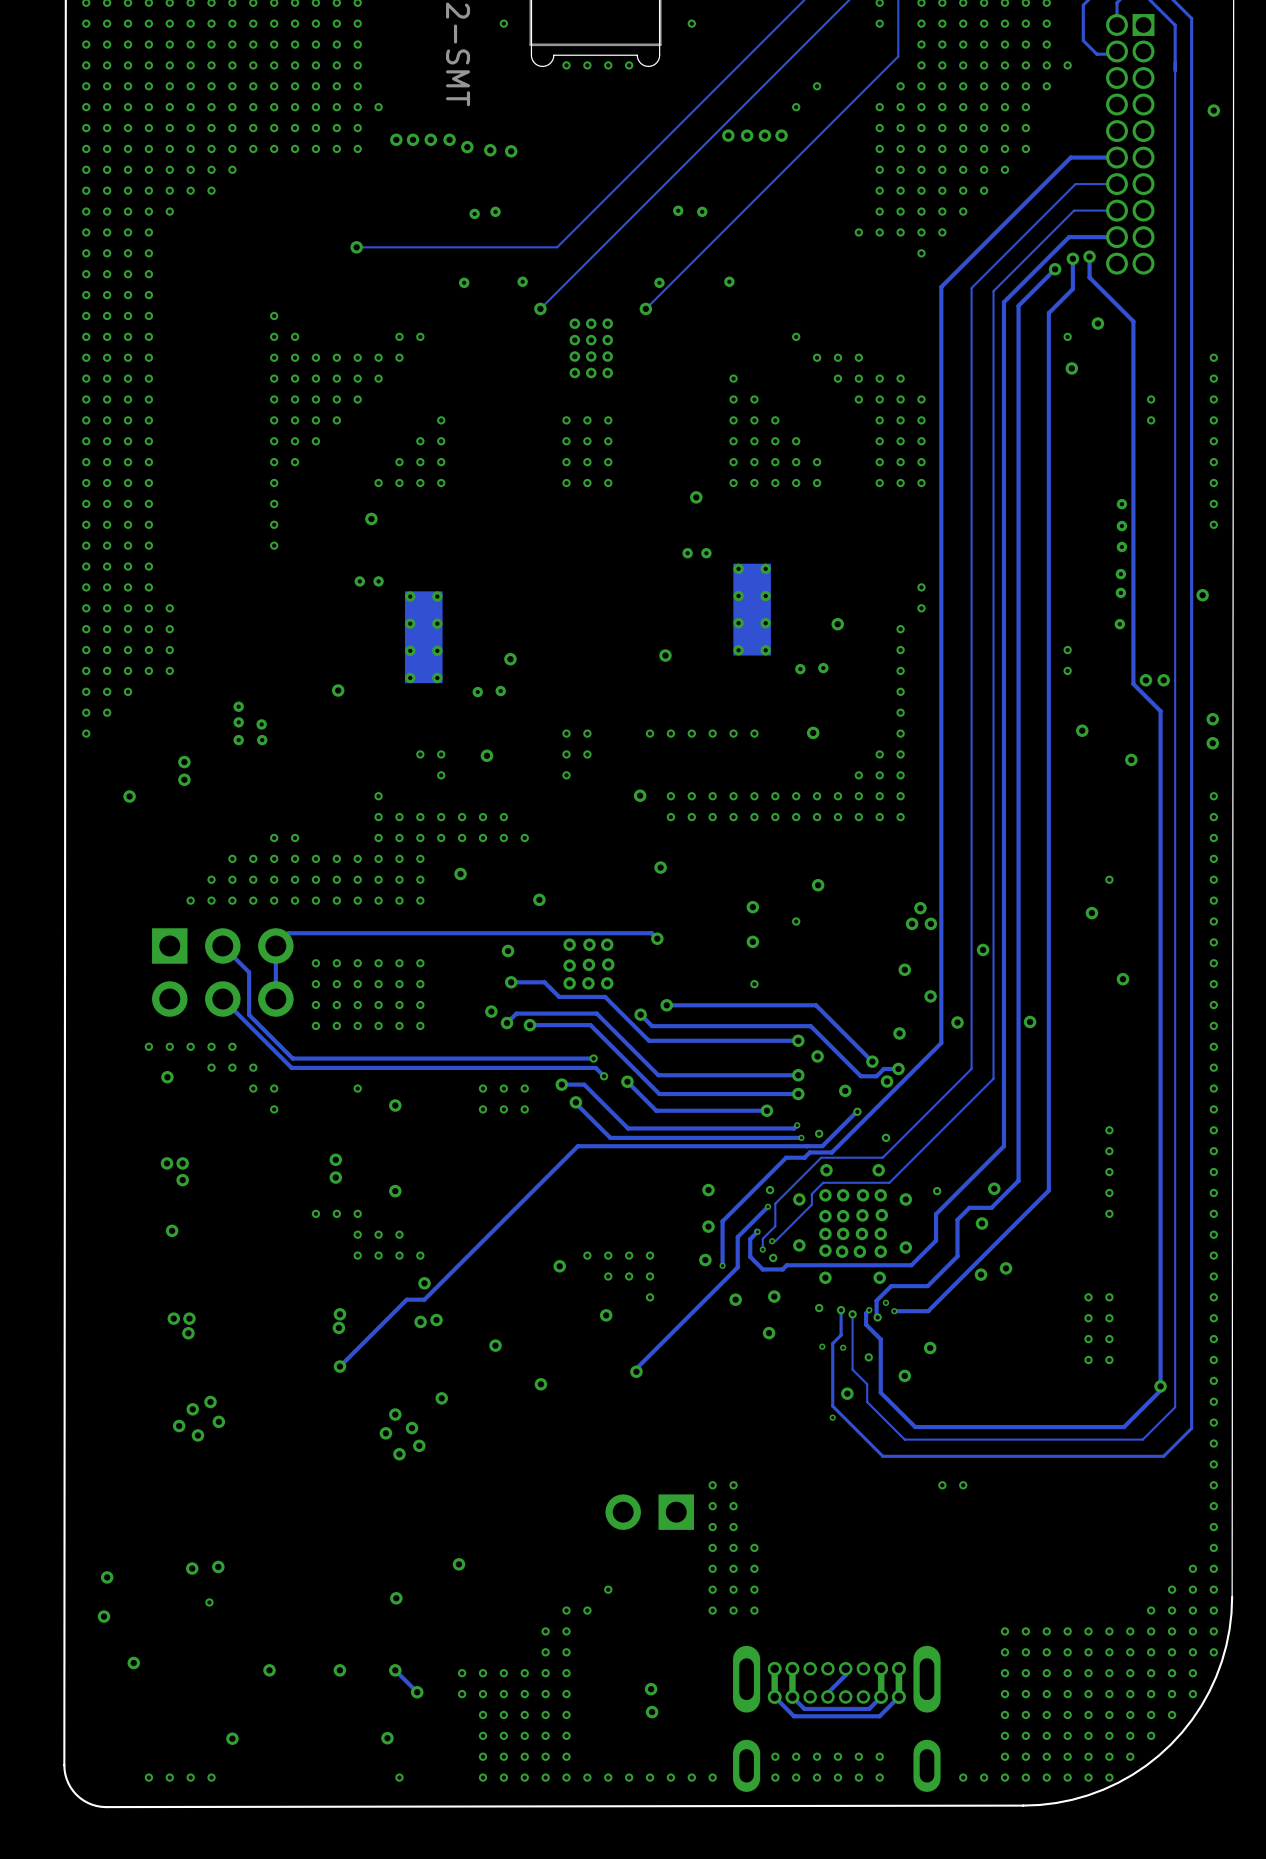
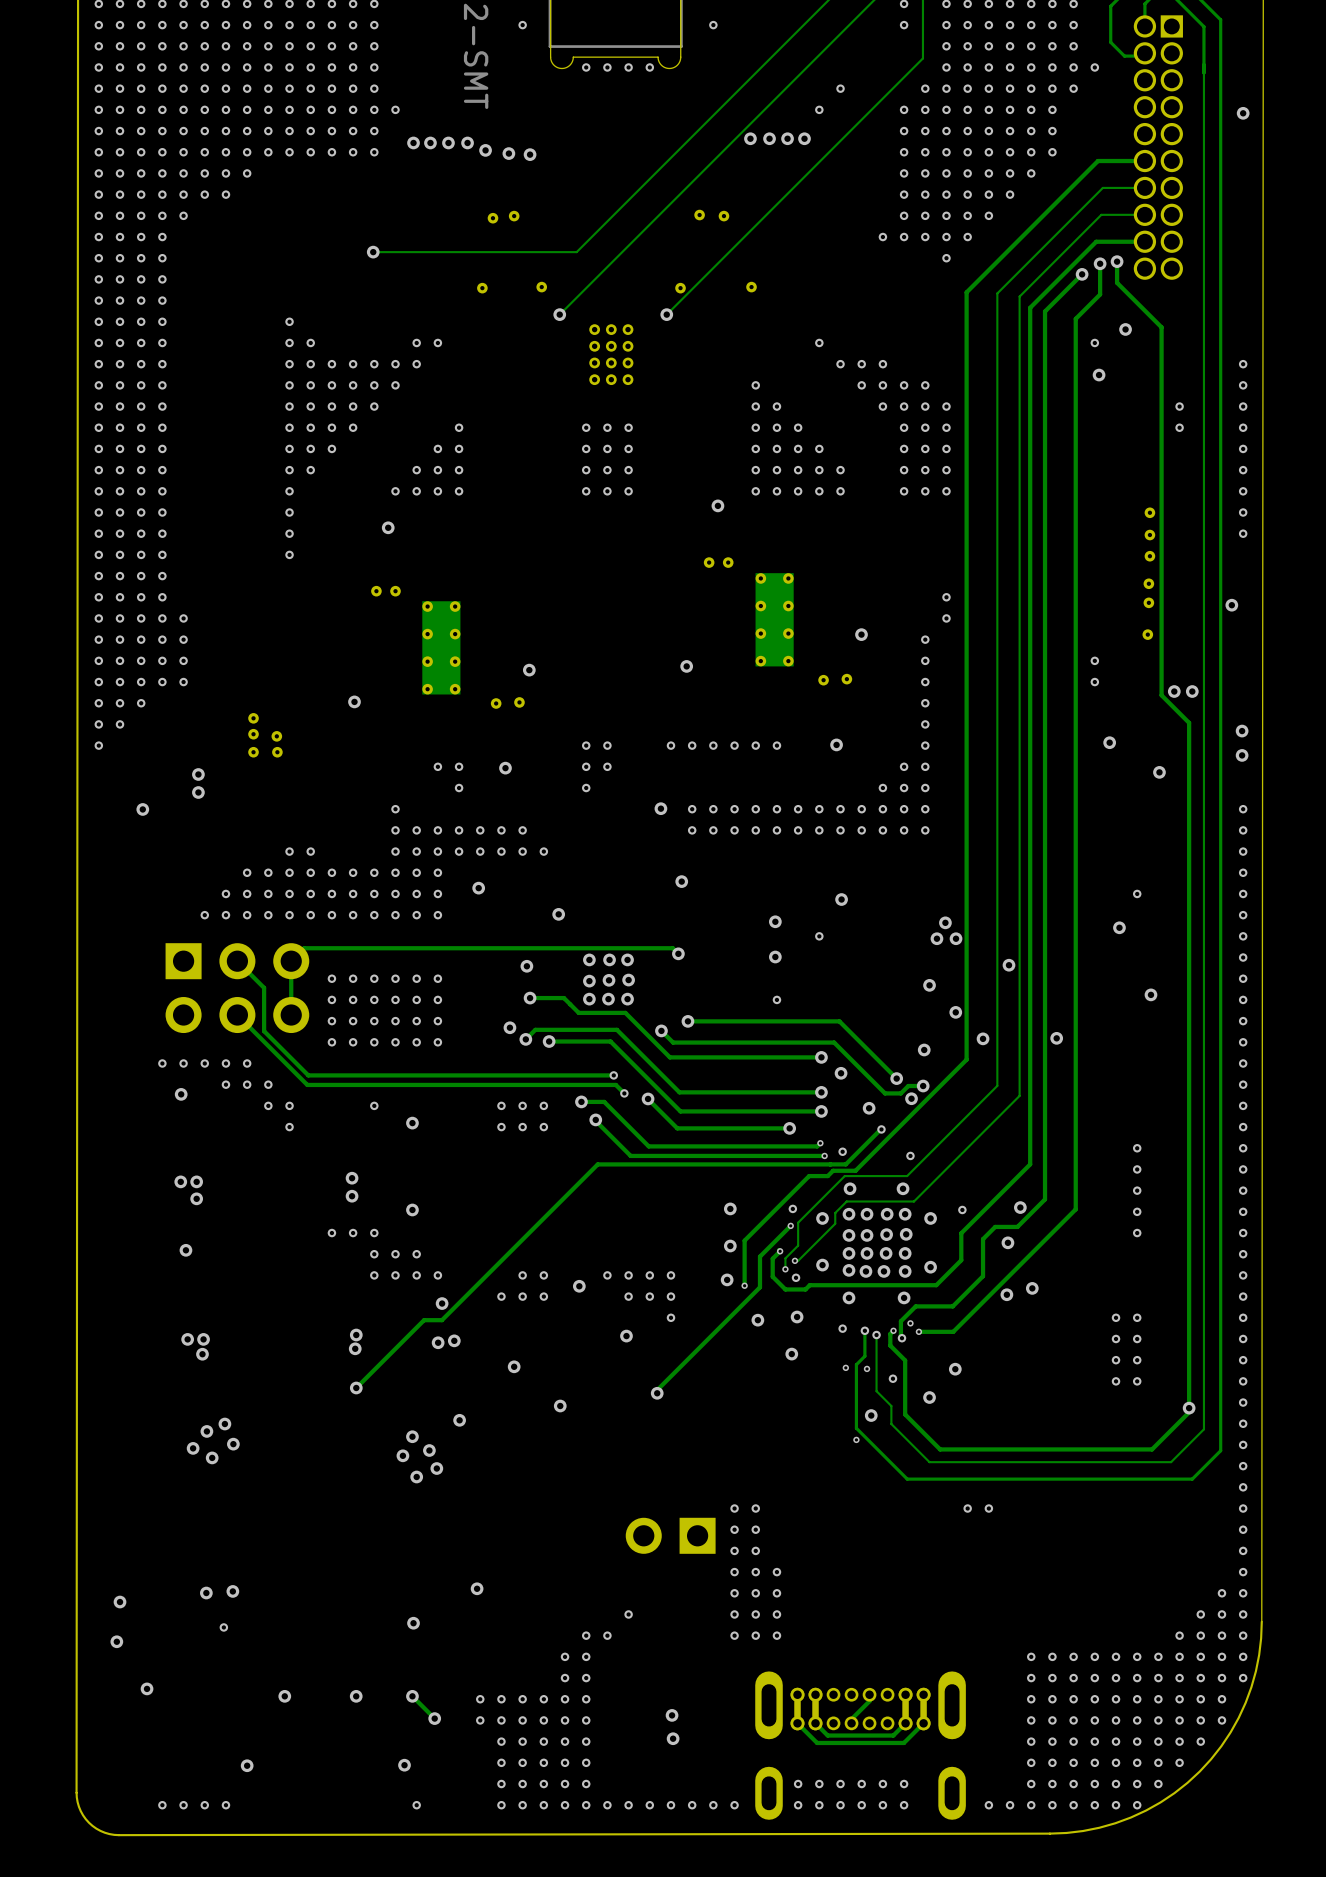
via: none -> (522, 1275)
via: none -> (543, 1275)
via: none -> (501, 1296)
via: none -> (522, 1296)
via: none -> (543, 1296)

